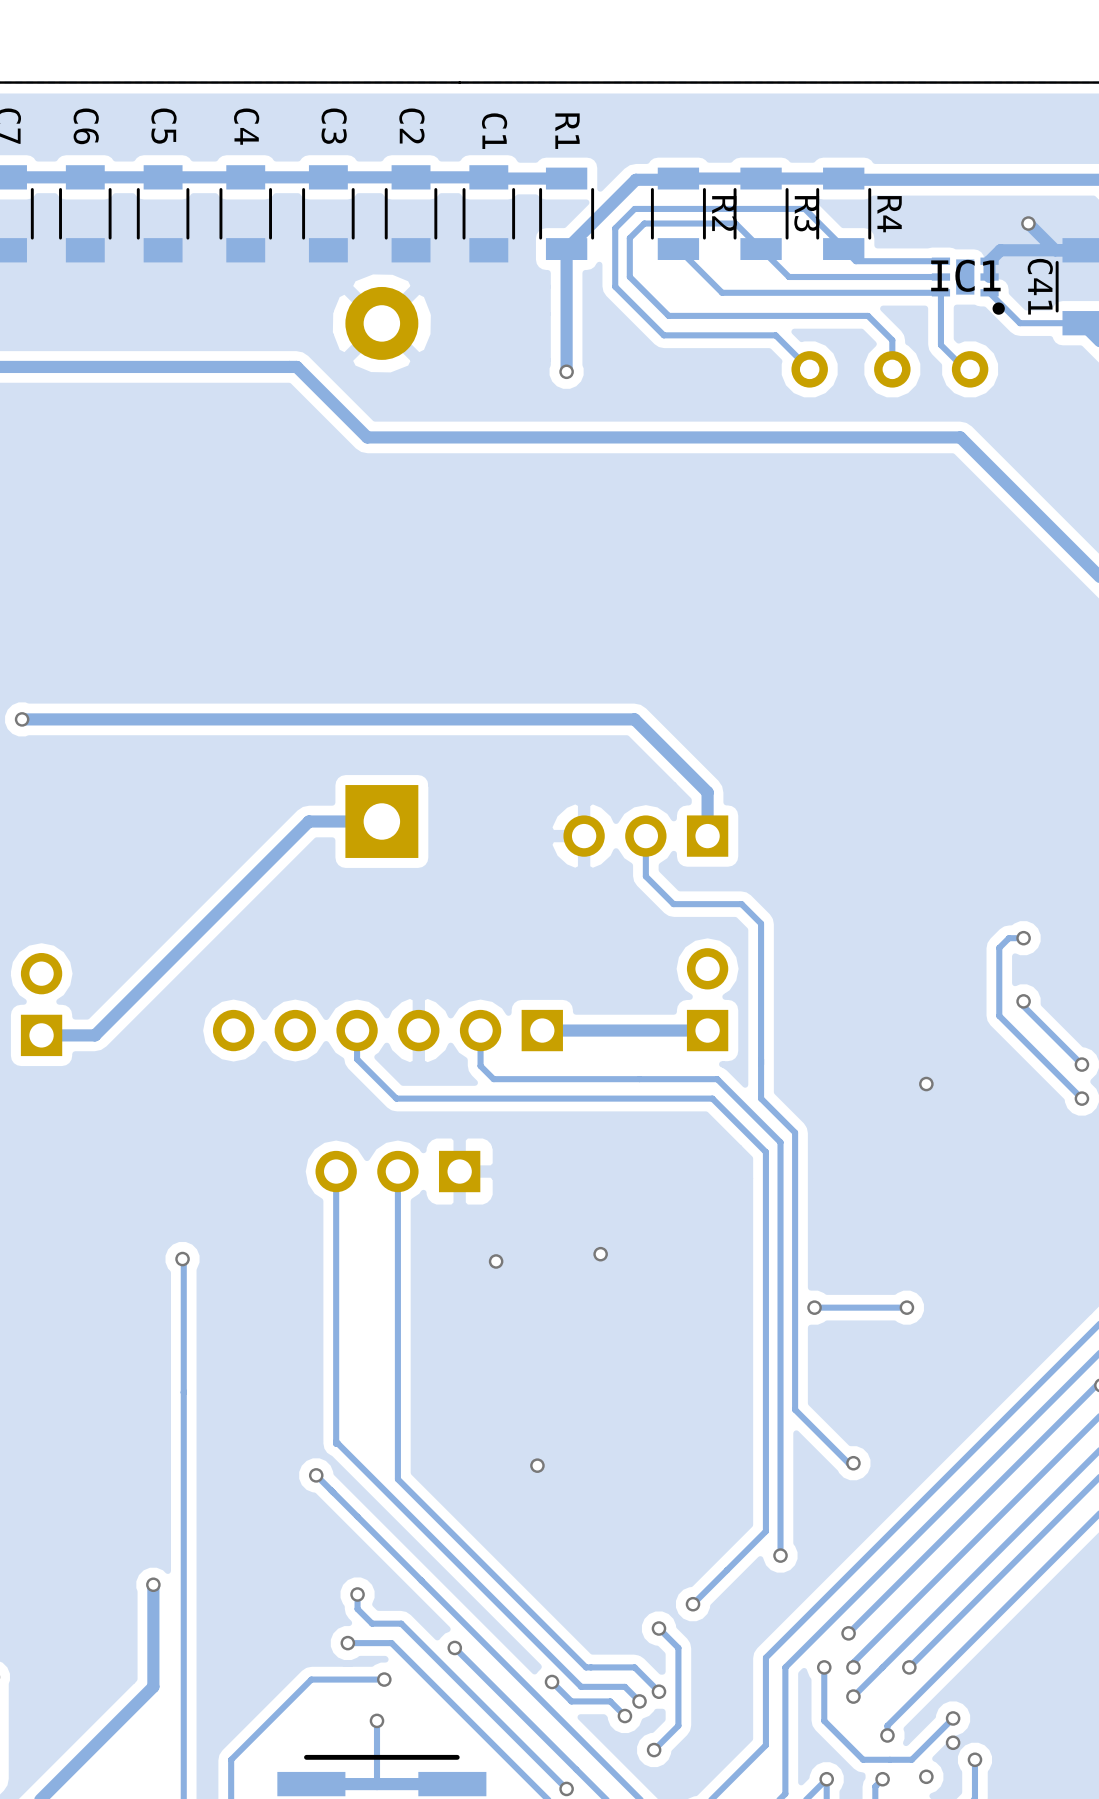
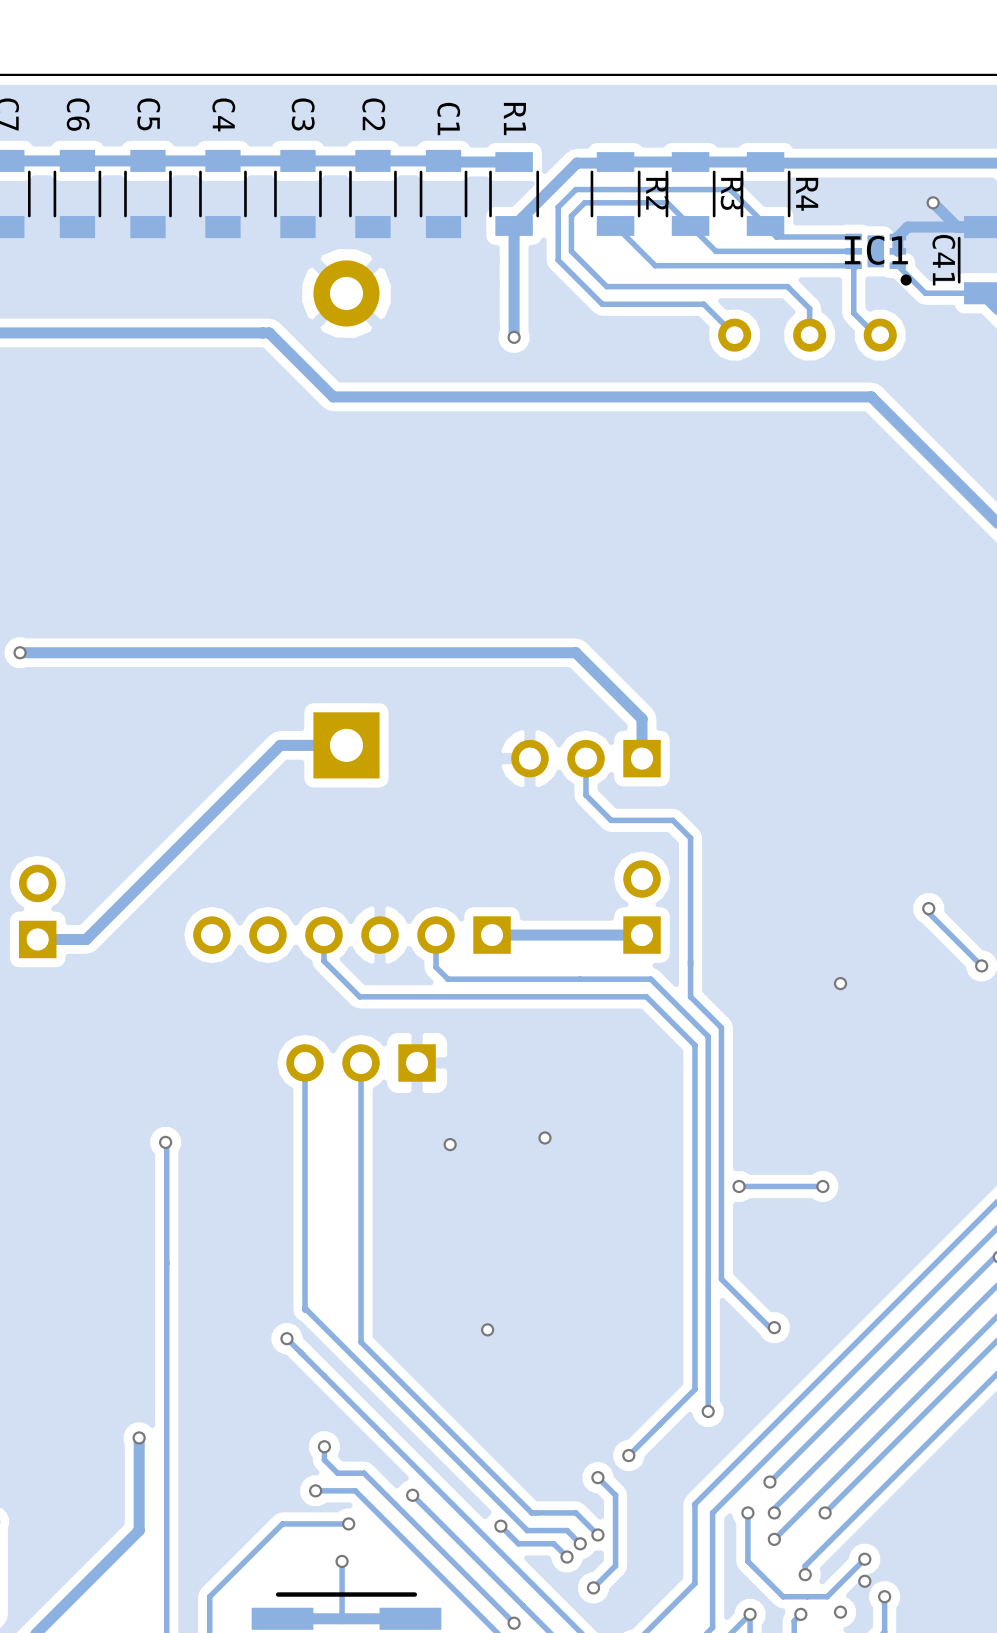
track: (1023, 938) (1009, 938) (999, 947) (999, 1015) (1081, 1098) -> none
via: (1023, 938) -> none
via: (1081, 1098) -> none

